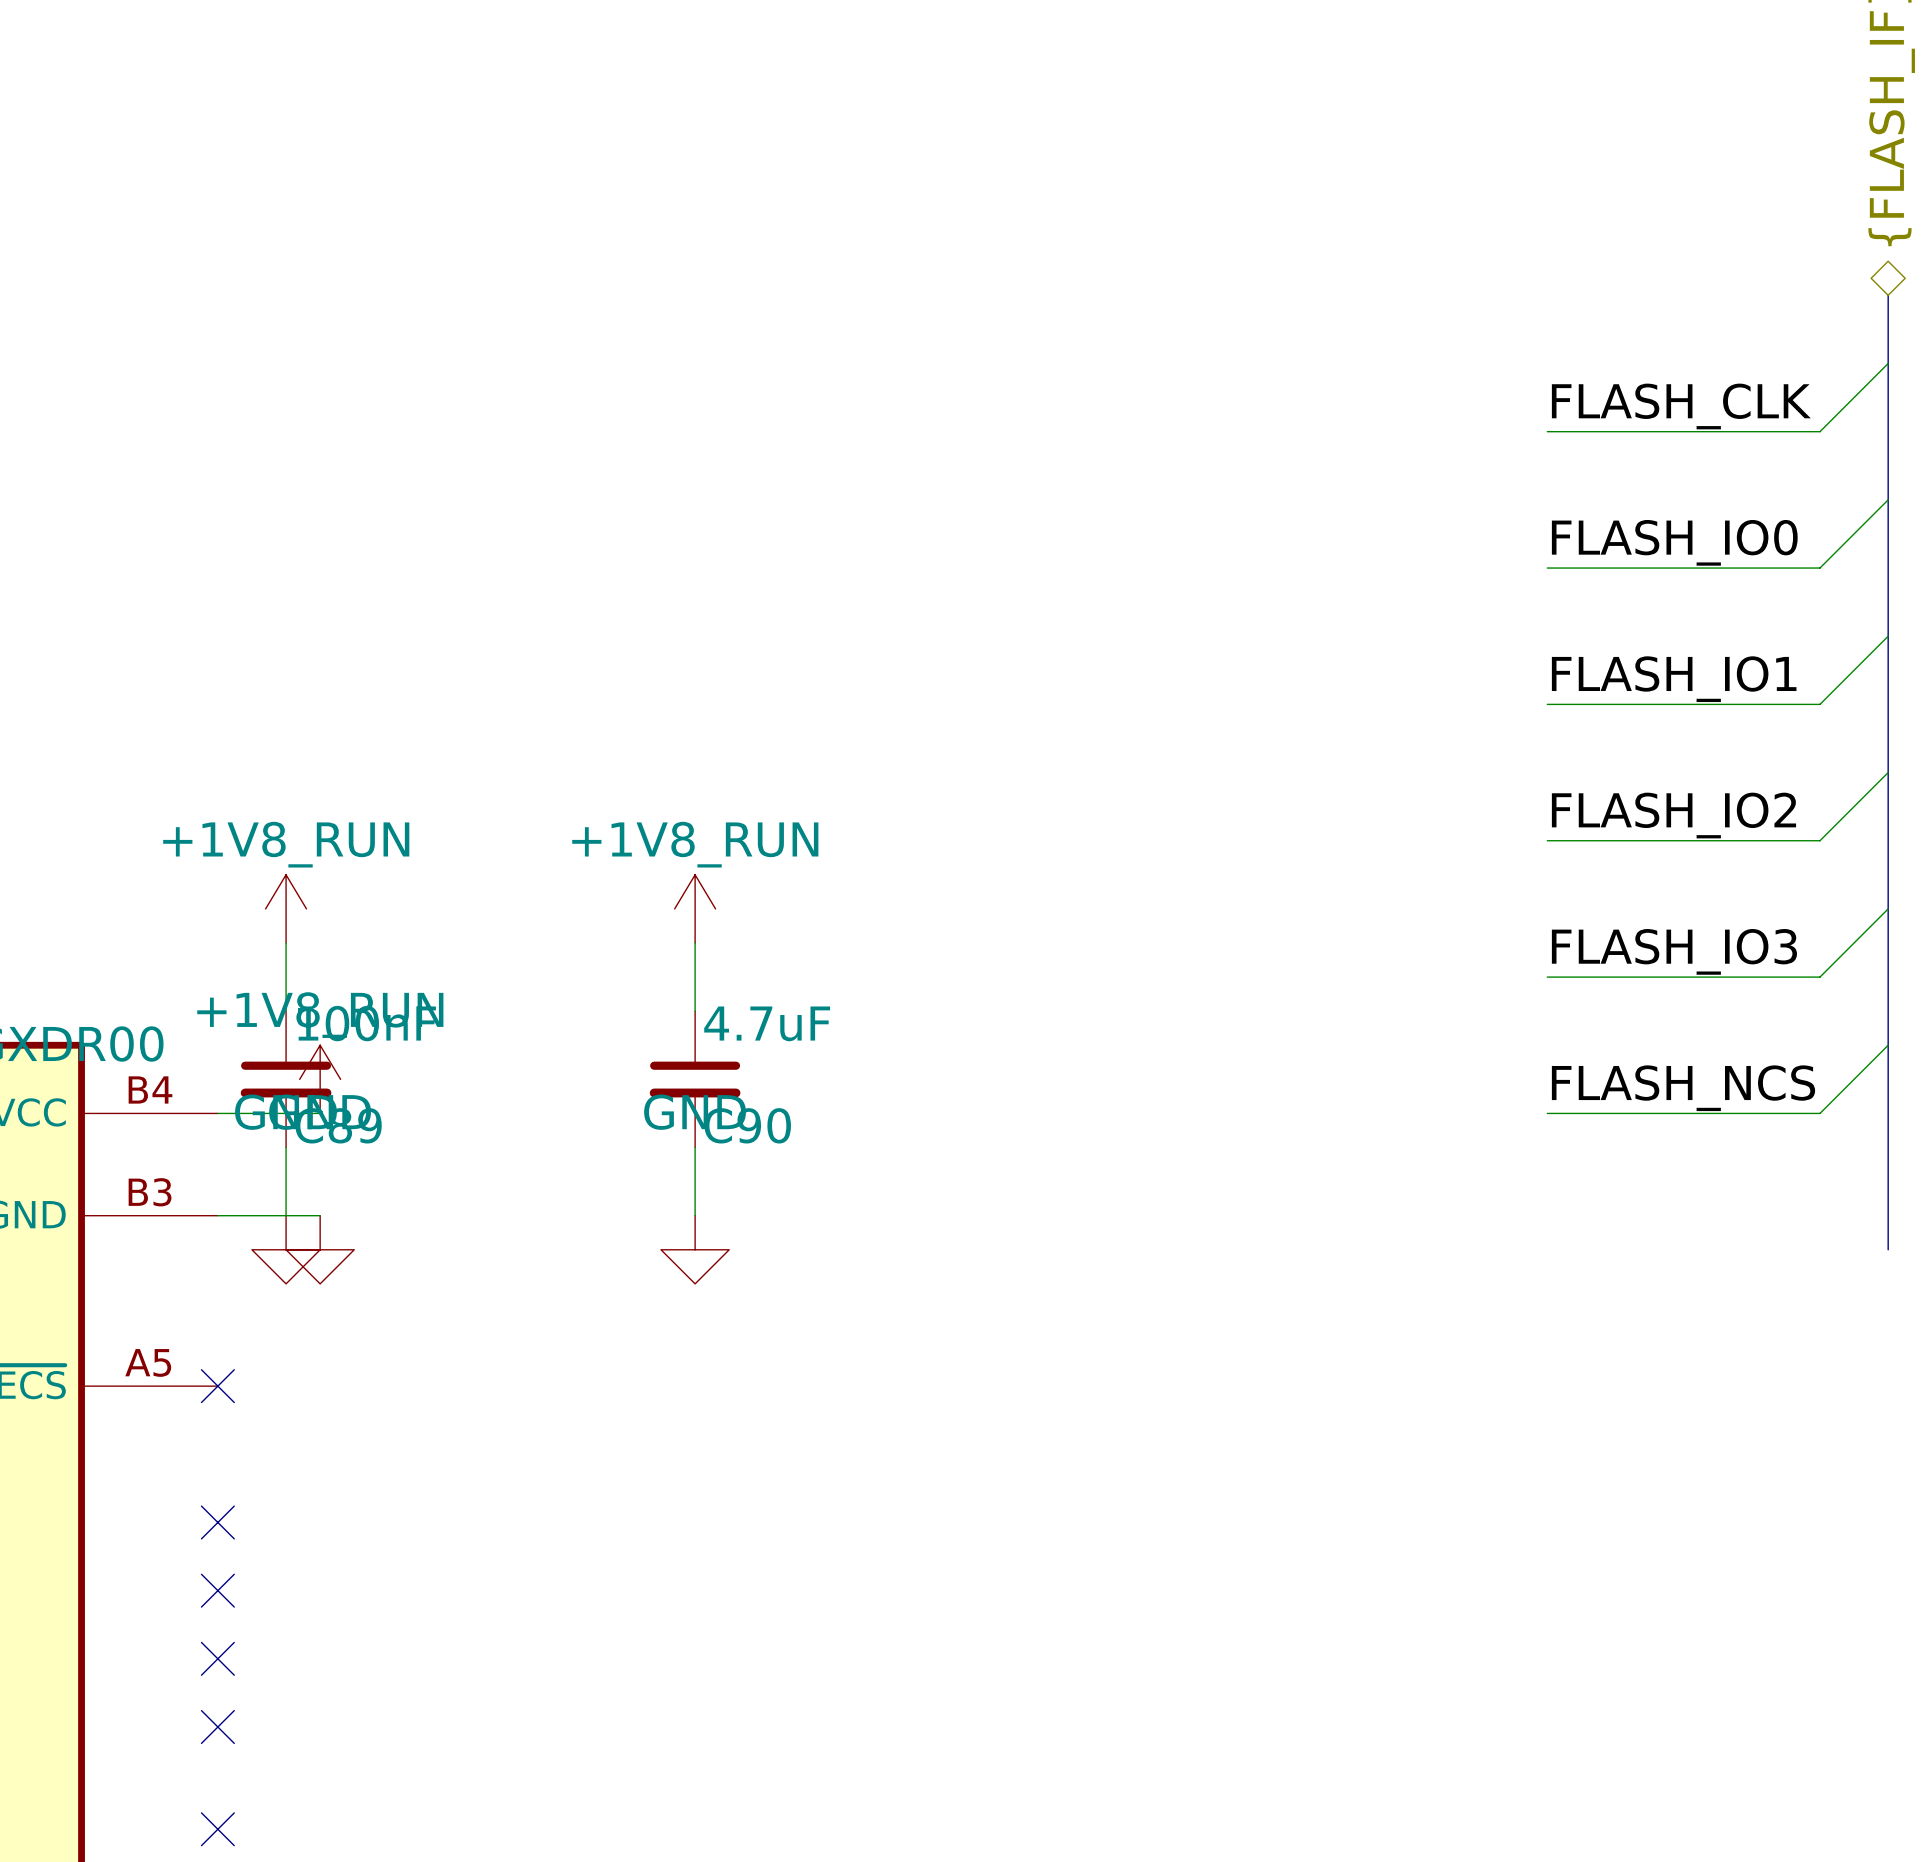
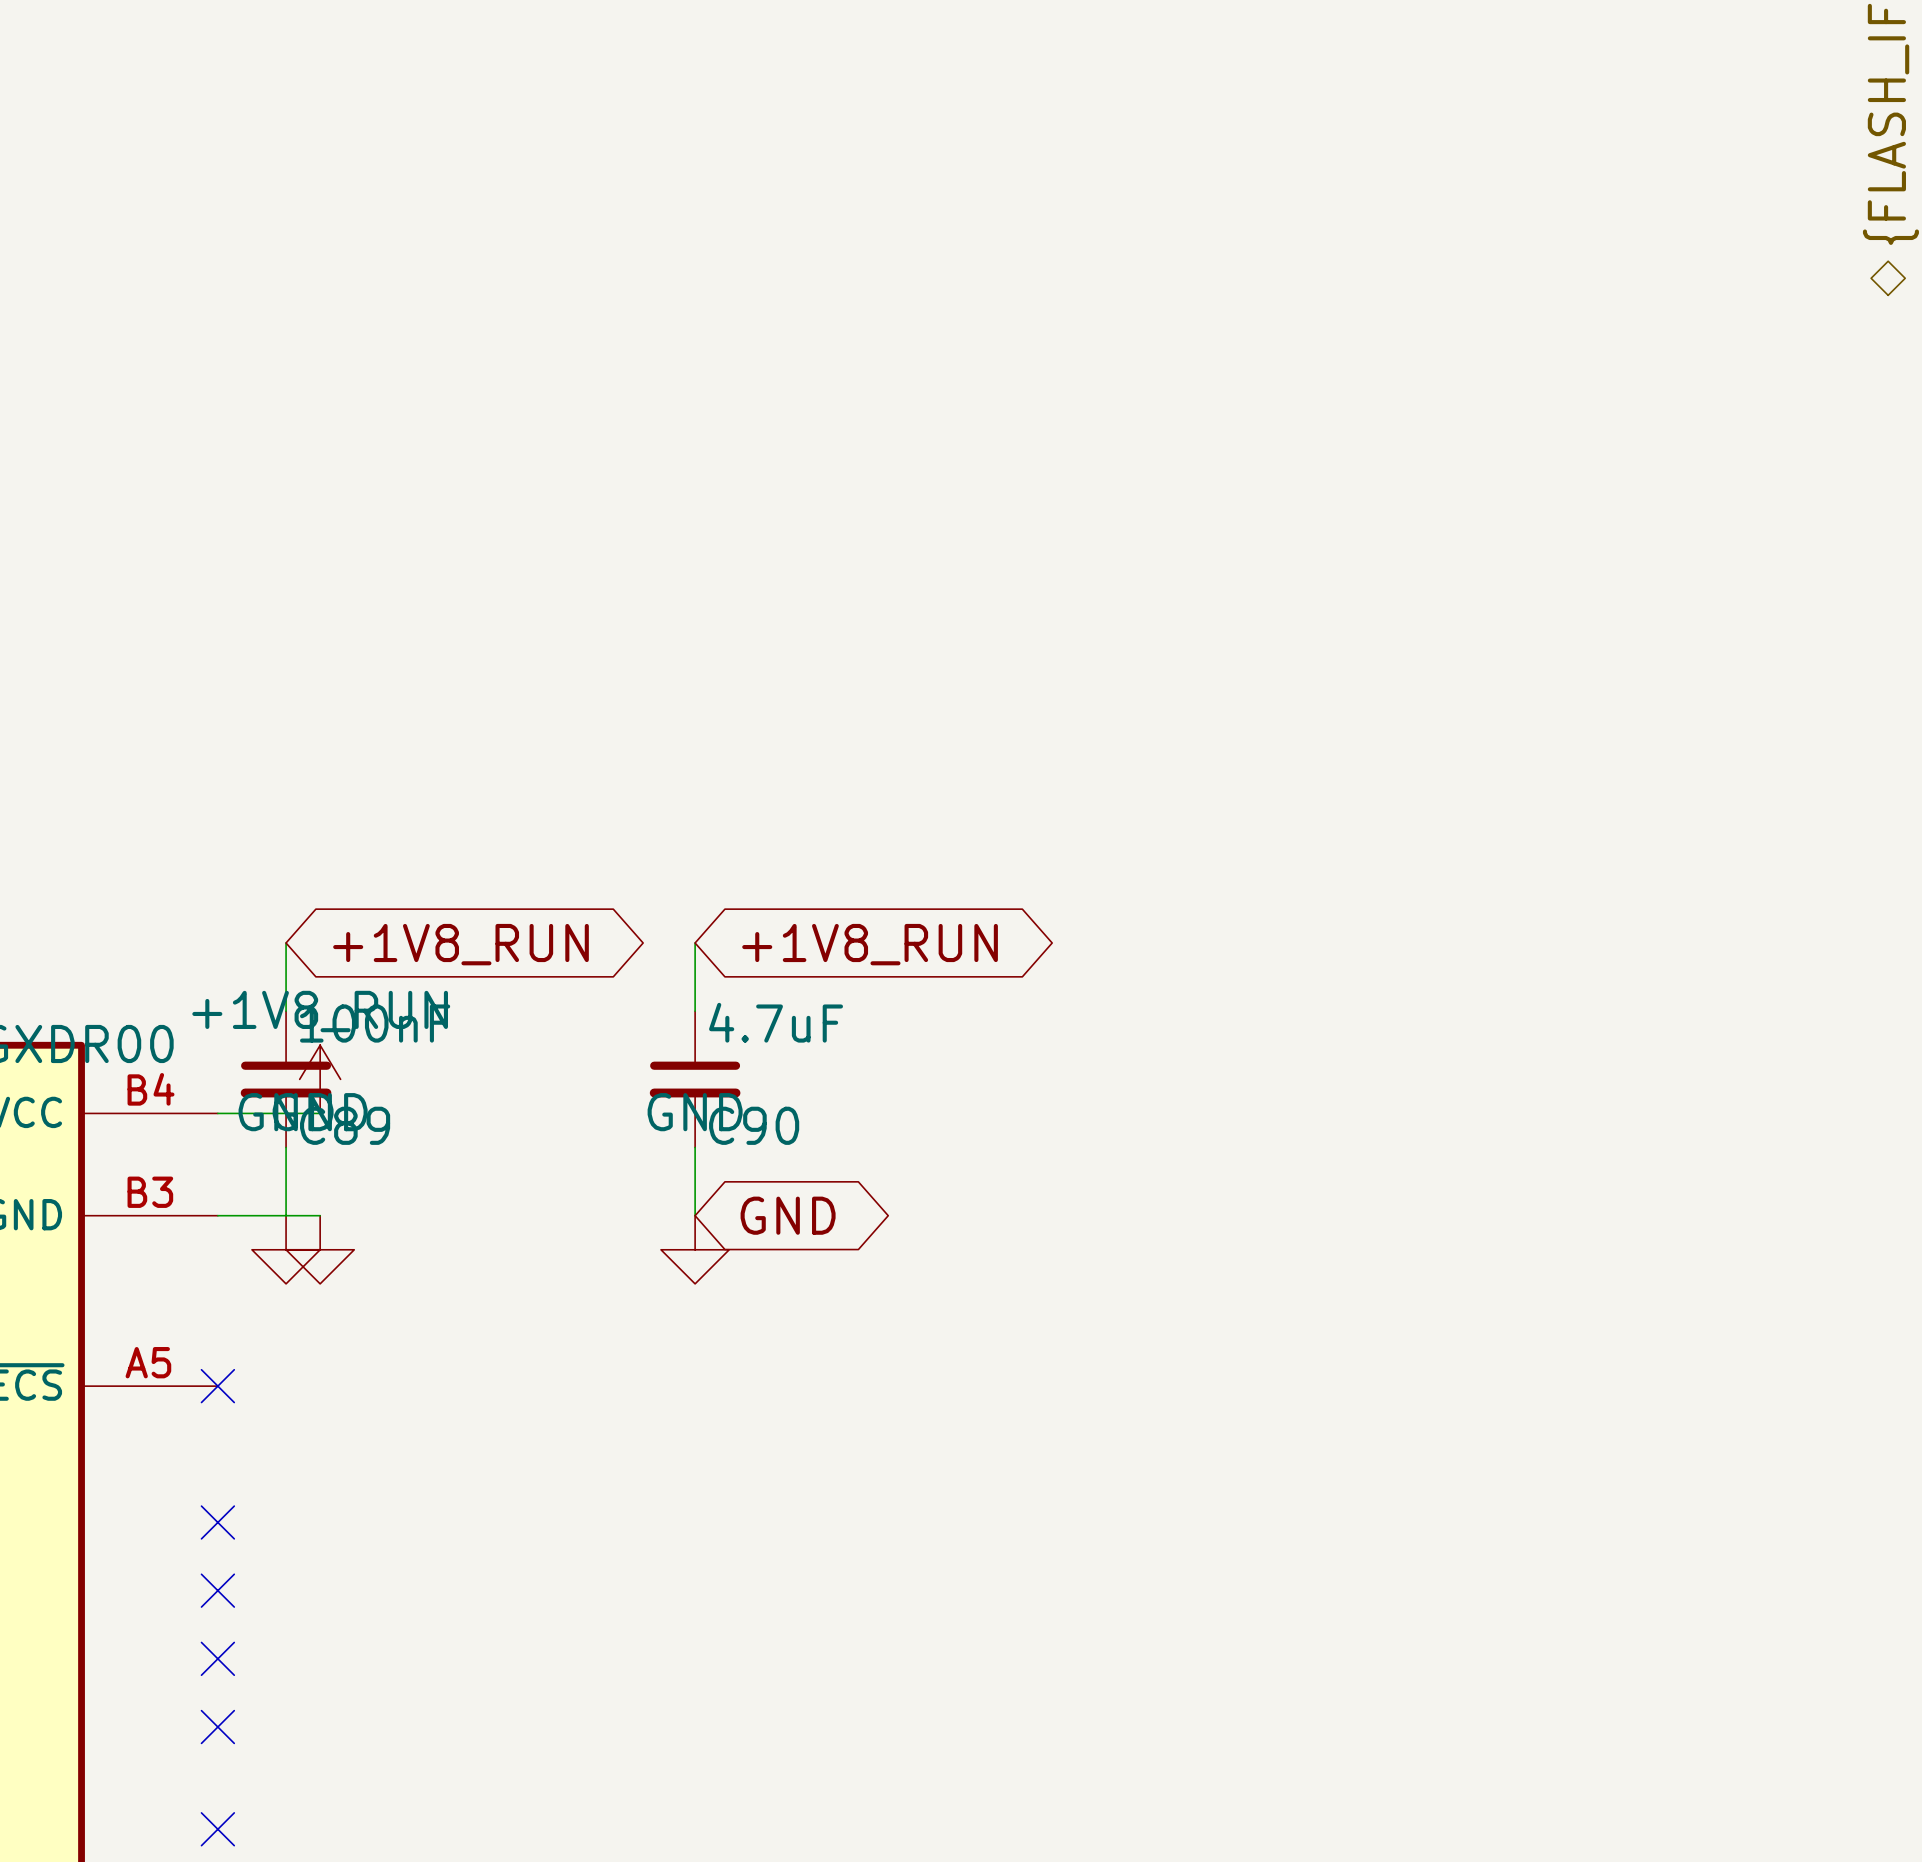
bus: (1888, 295) (1888, 1249) -> none
wire: (1888, 363) (1819, 431) (1547, 431) -> none
label: FLASH_CLK (1681, 406) -> none
wire: (1888, 499) (1819, 568) (1547, 568) -> none
label: FLASH_IO0 (1674, 542) -> none
wire: (1888, 636) (1819, 704) (1547, 704) -> none
label: FLASH_IO1 (1674, 679) -> none
wire: (1888, 772) (1819, 840) (1547, 840) -> none
label: FLASH_IO2 (1673, 815) -> none
power symbol: +1V8_RUN (286, 908) -> none
power symbol: +1V8_RUN (695, 908) -> none
wire: (1888, 908) (1819, 977) (1547, 977) -> none
global label: none -> +1V8_RUN (461, 944)
global label: none -> +1V8_RUN (870, 944)
label: FLASH_IO3 (1674, 951) -> none
wire: (1888, 1045) (1819, 1113) (1547, 1113) -> none
label: FLASH_NCS (1683, 1088) -> none
global label: none -> GND (788, 1215)

